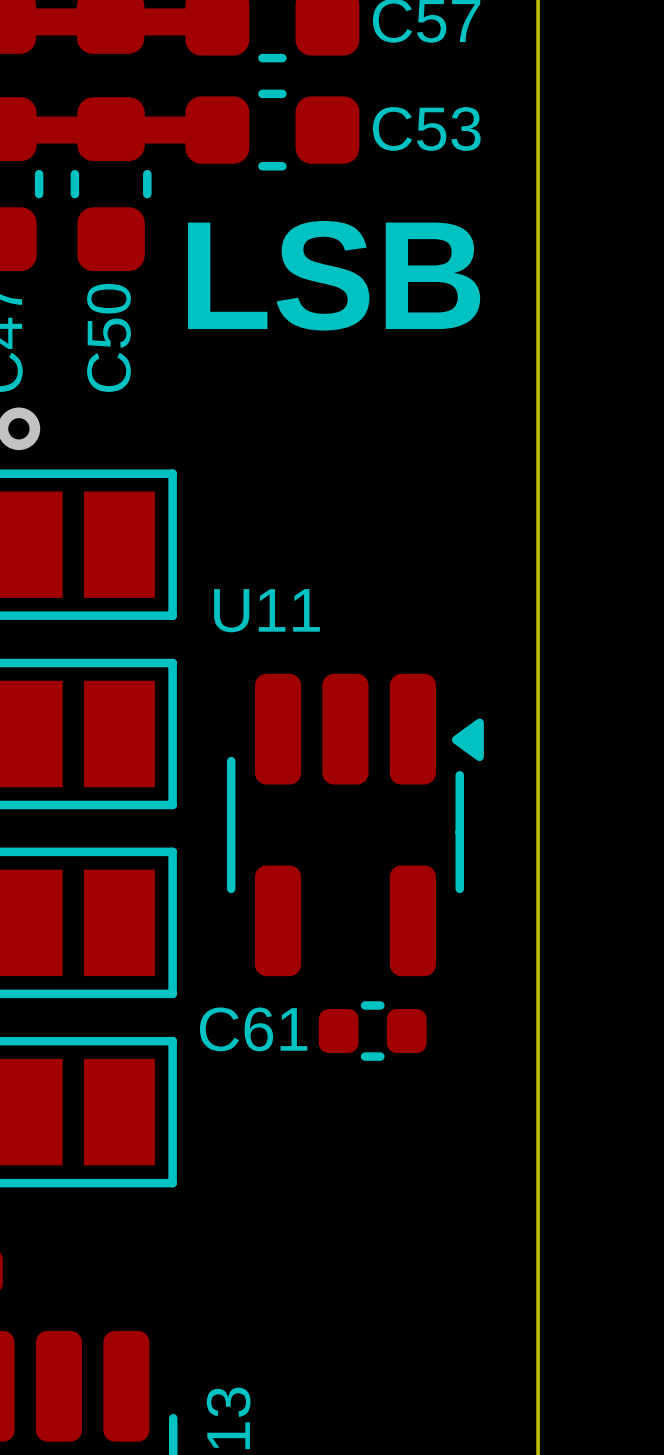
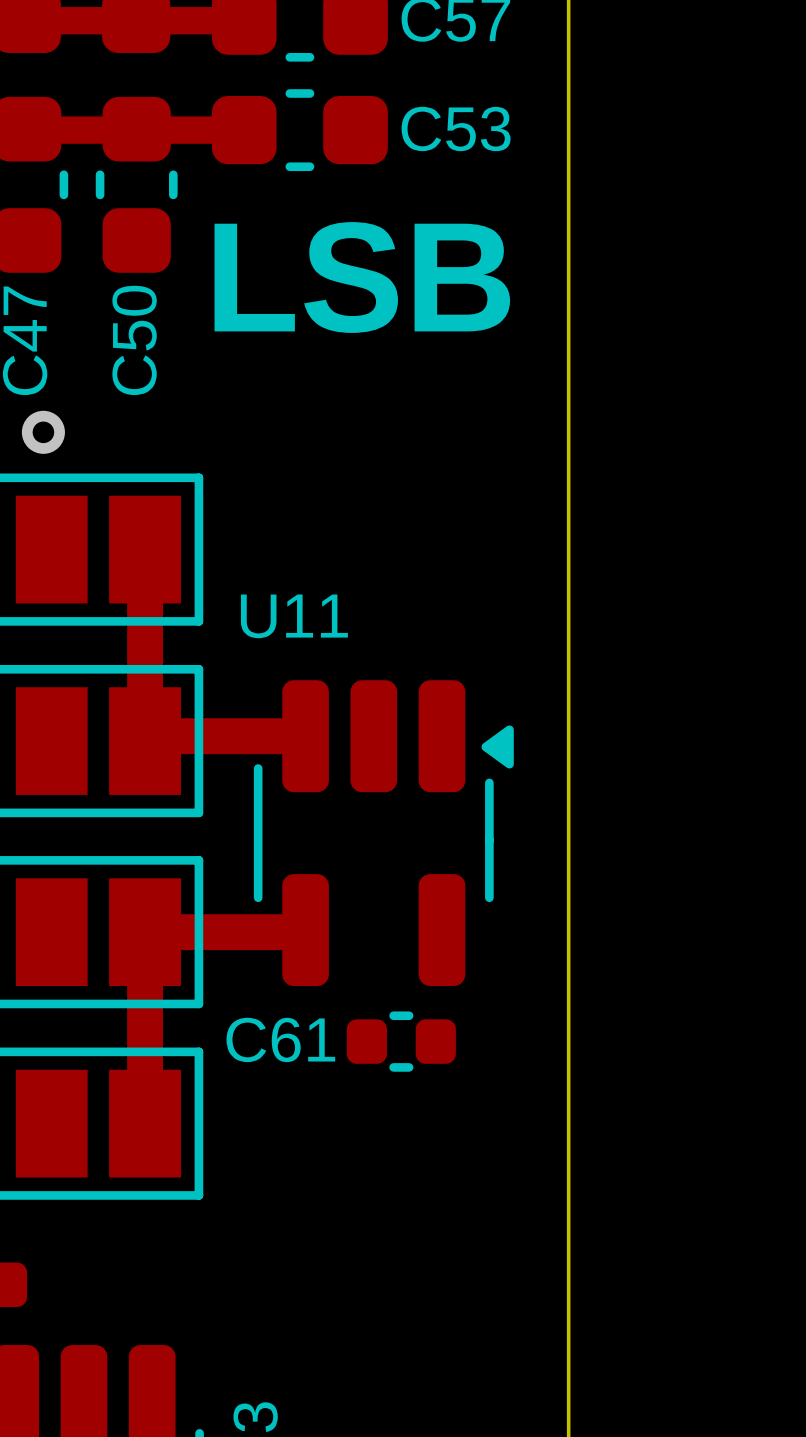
track: none -> (145, 549) (145, 741) (149, 736) (305, 736)
track: none -> (305, 930) (303, 932) (145, 932) (145, 1123)

